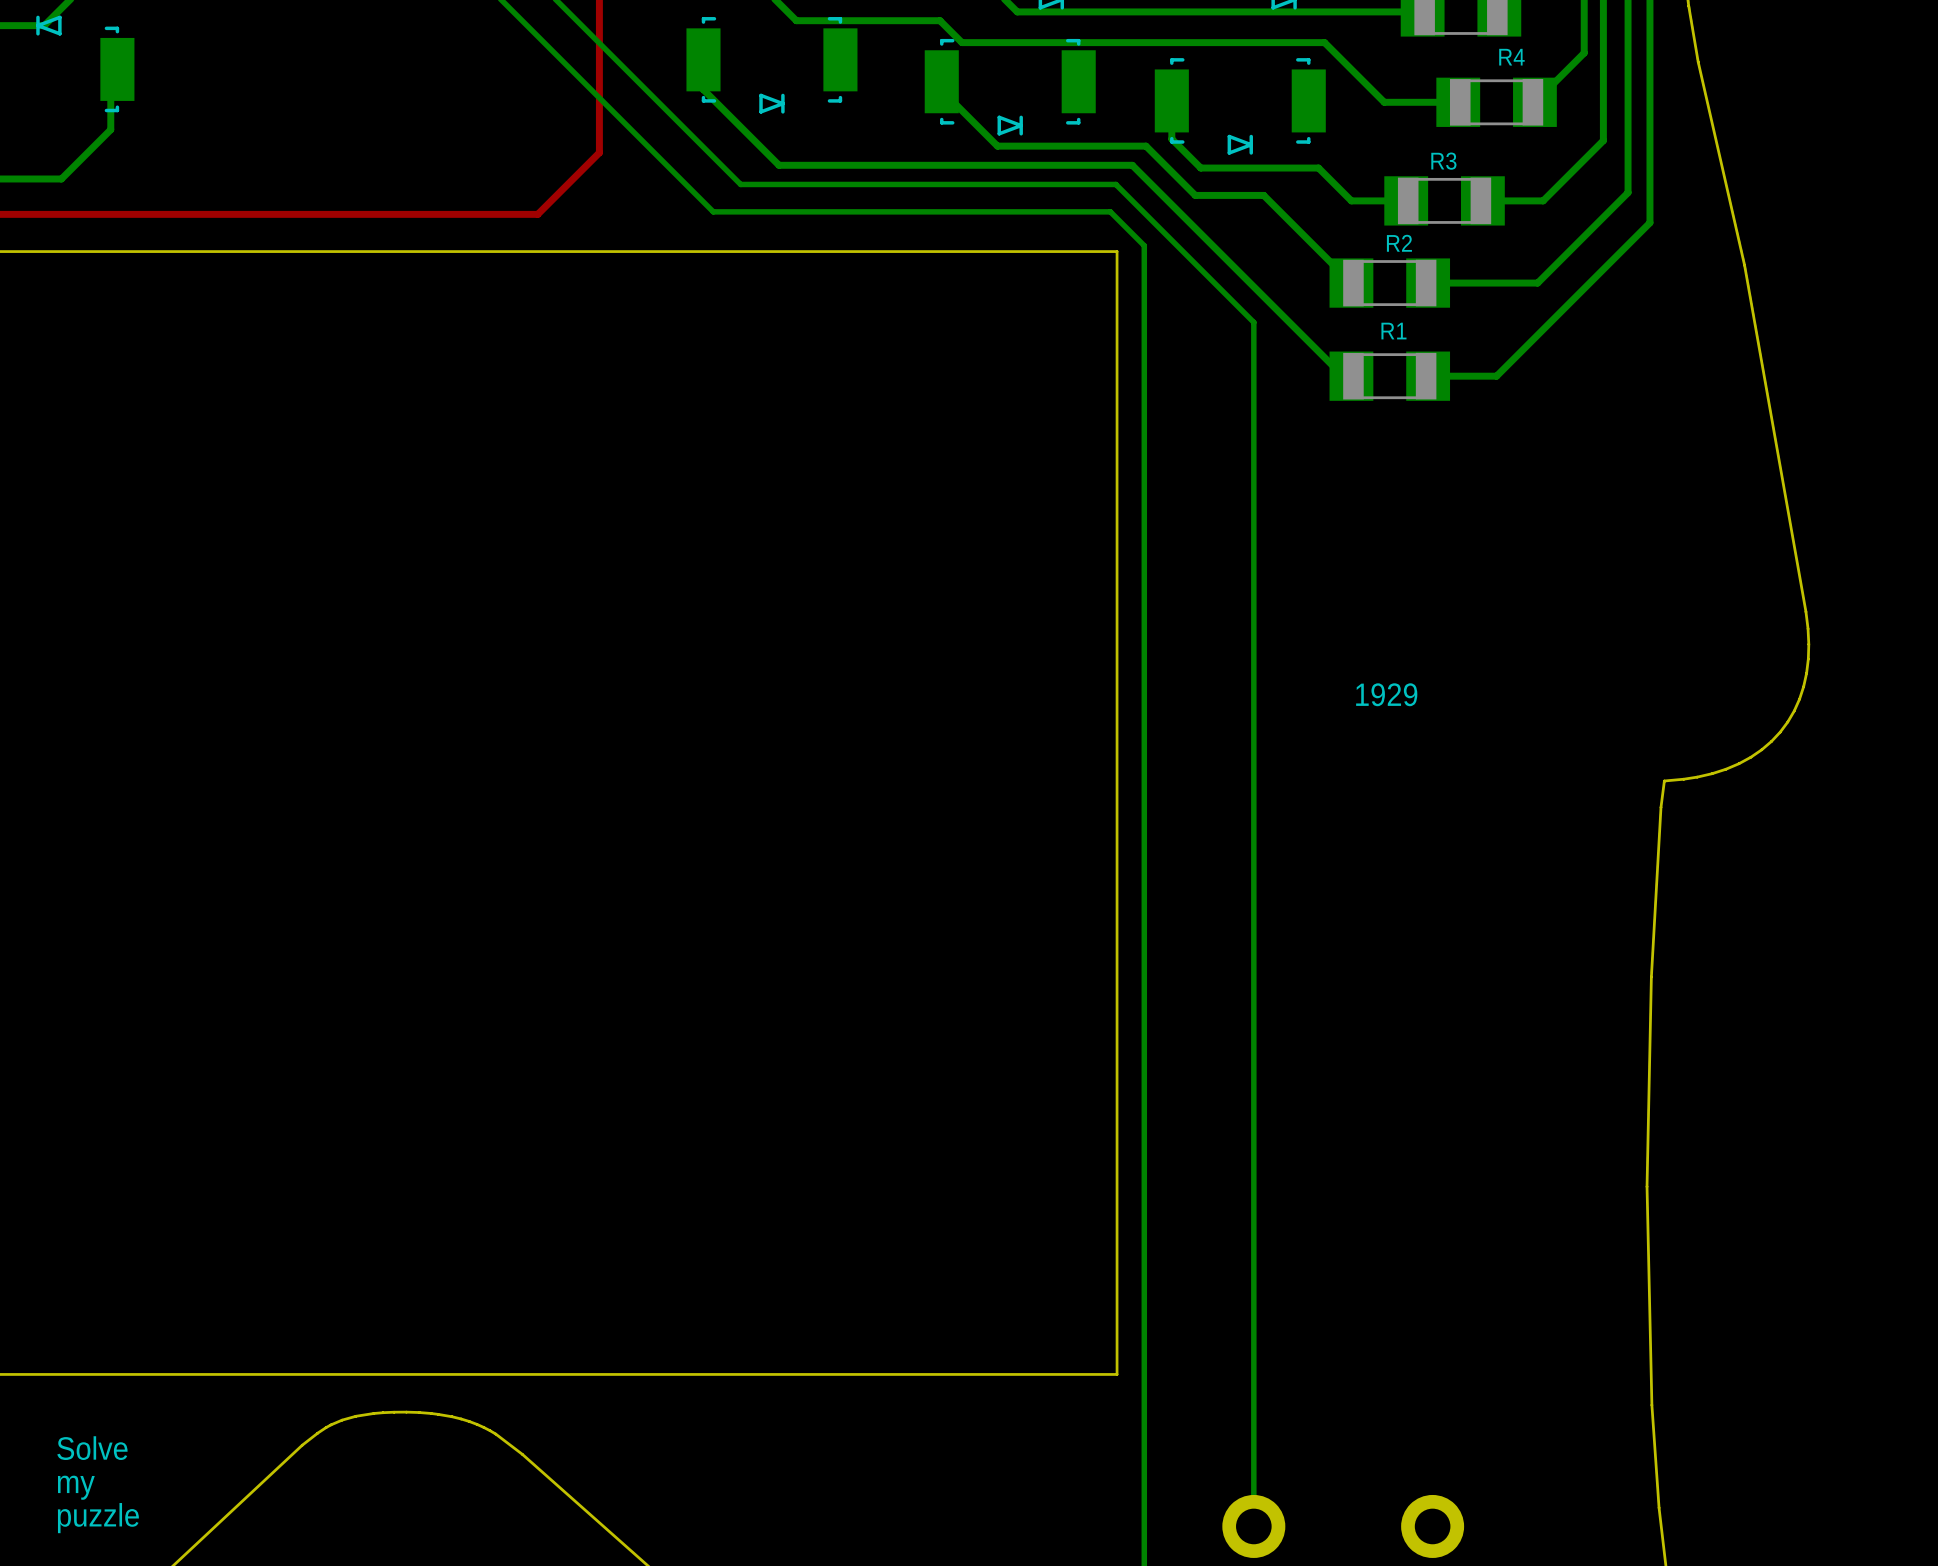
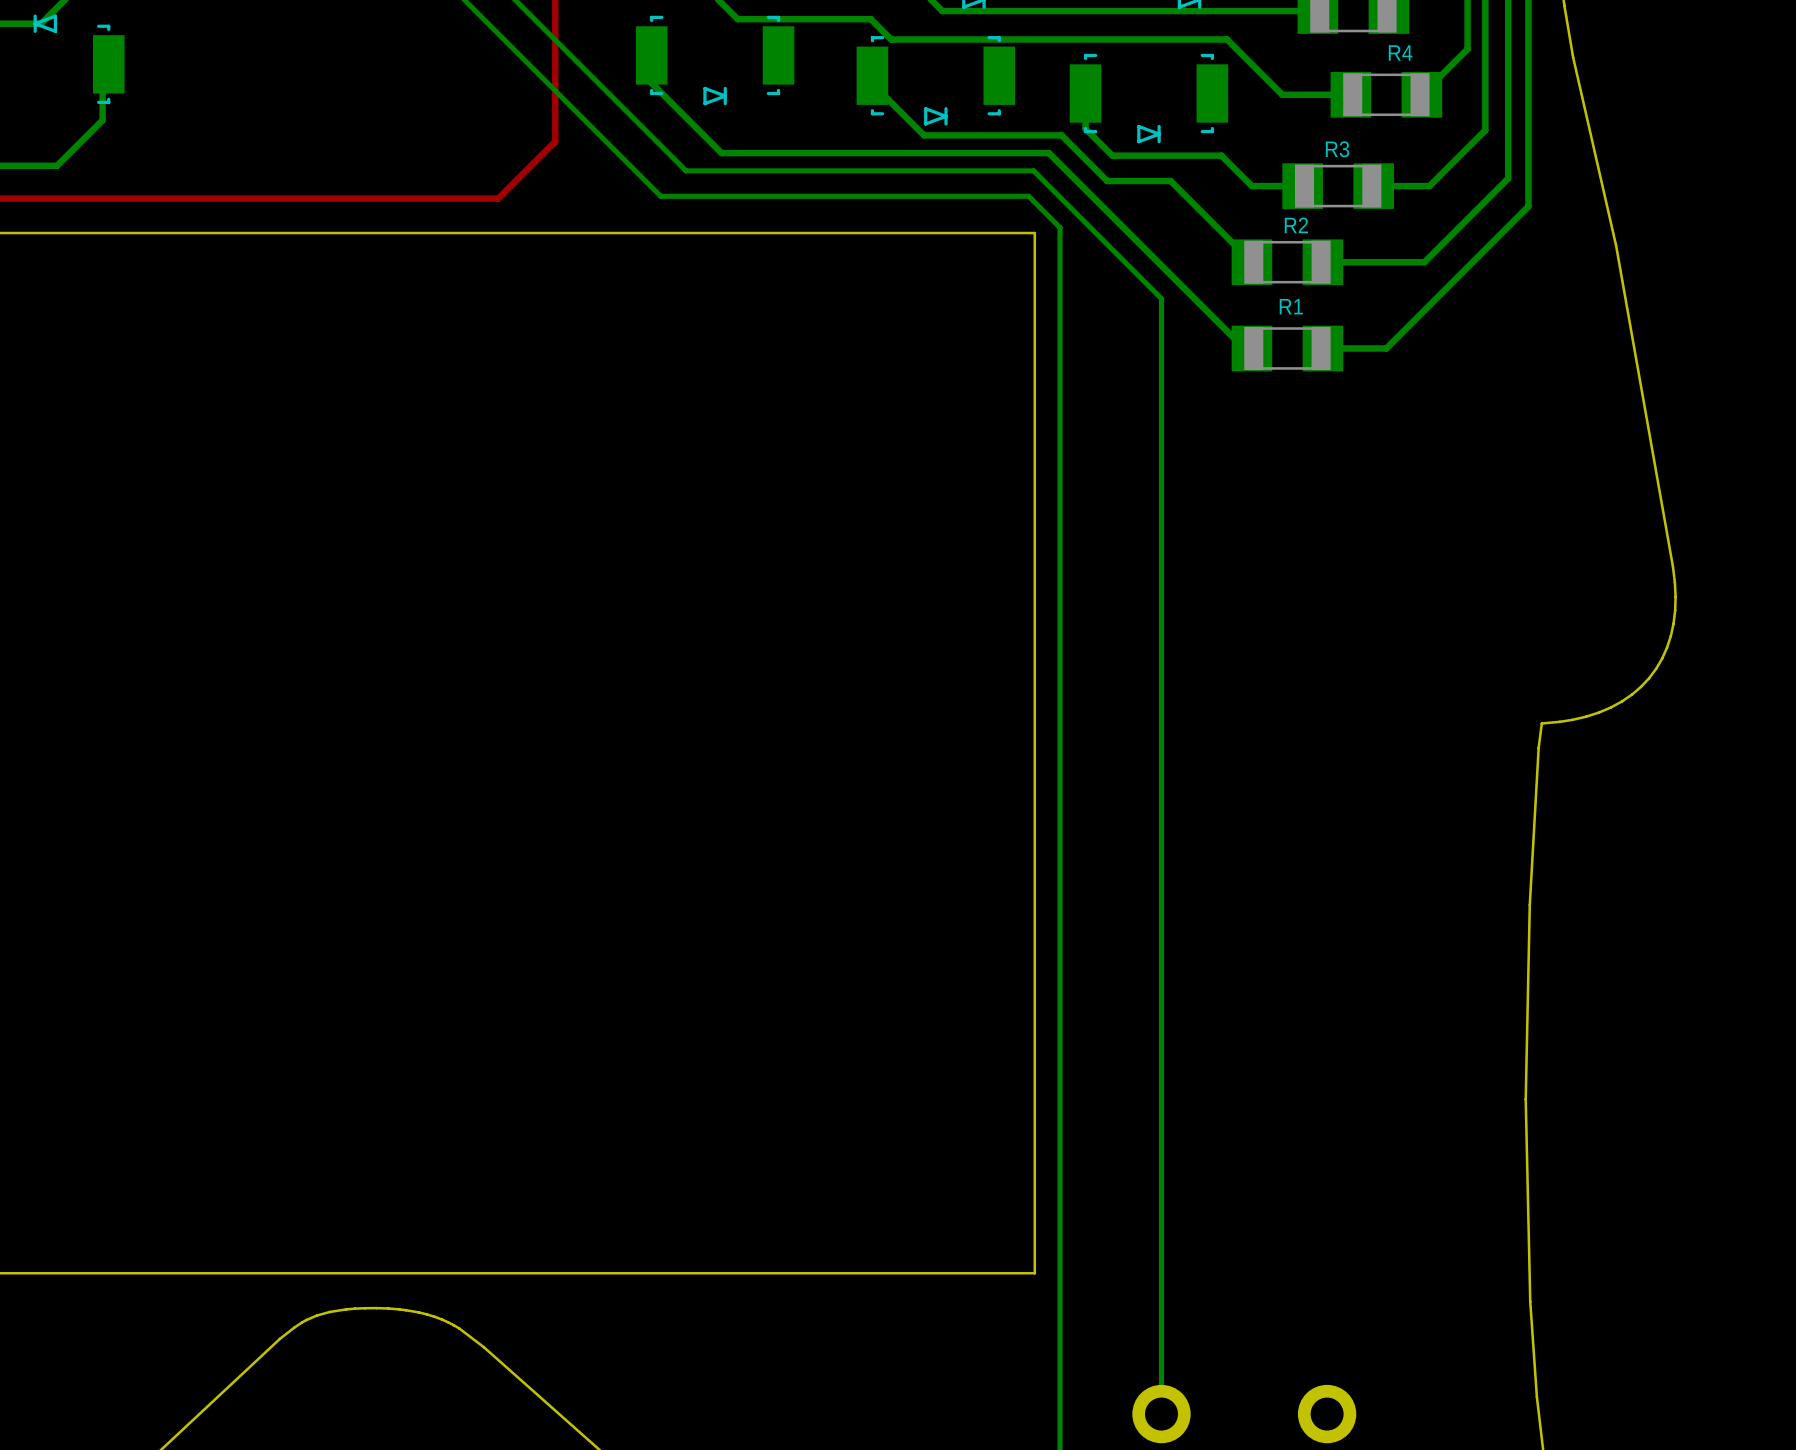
text: 1929 (1386, 694) -> none
text: Solve (92, 1448) -> none
text: my (76, 1487) -> none
text: puzzle (98, 1518) -> none

